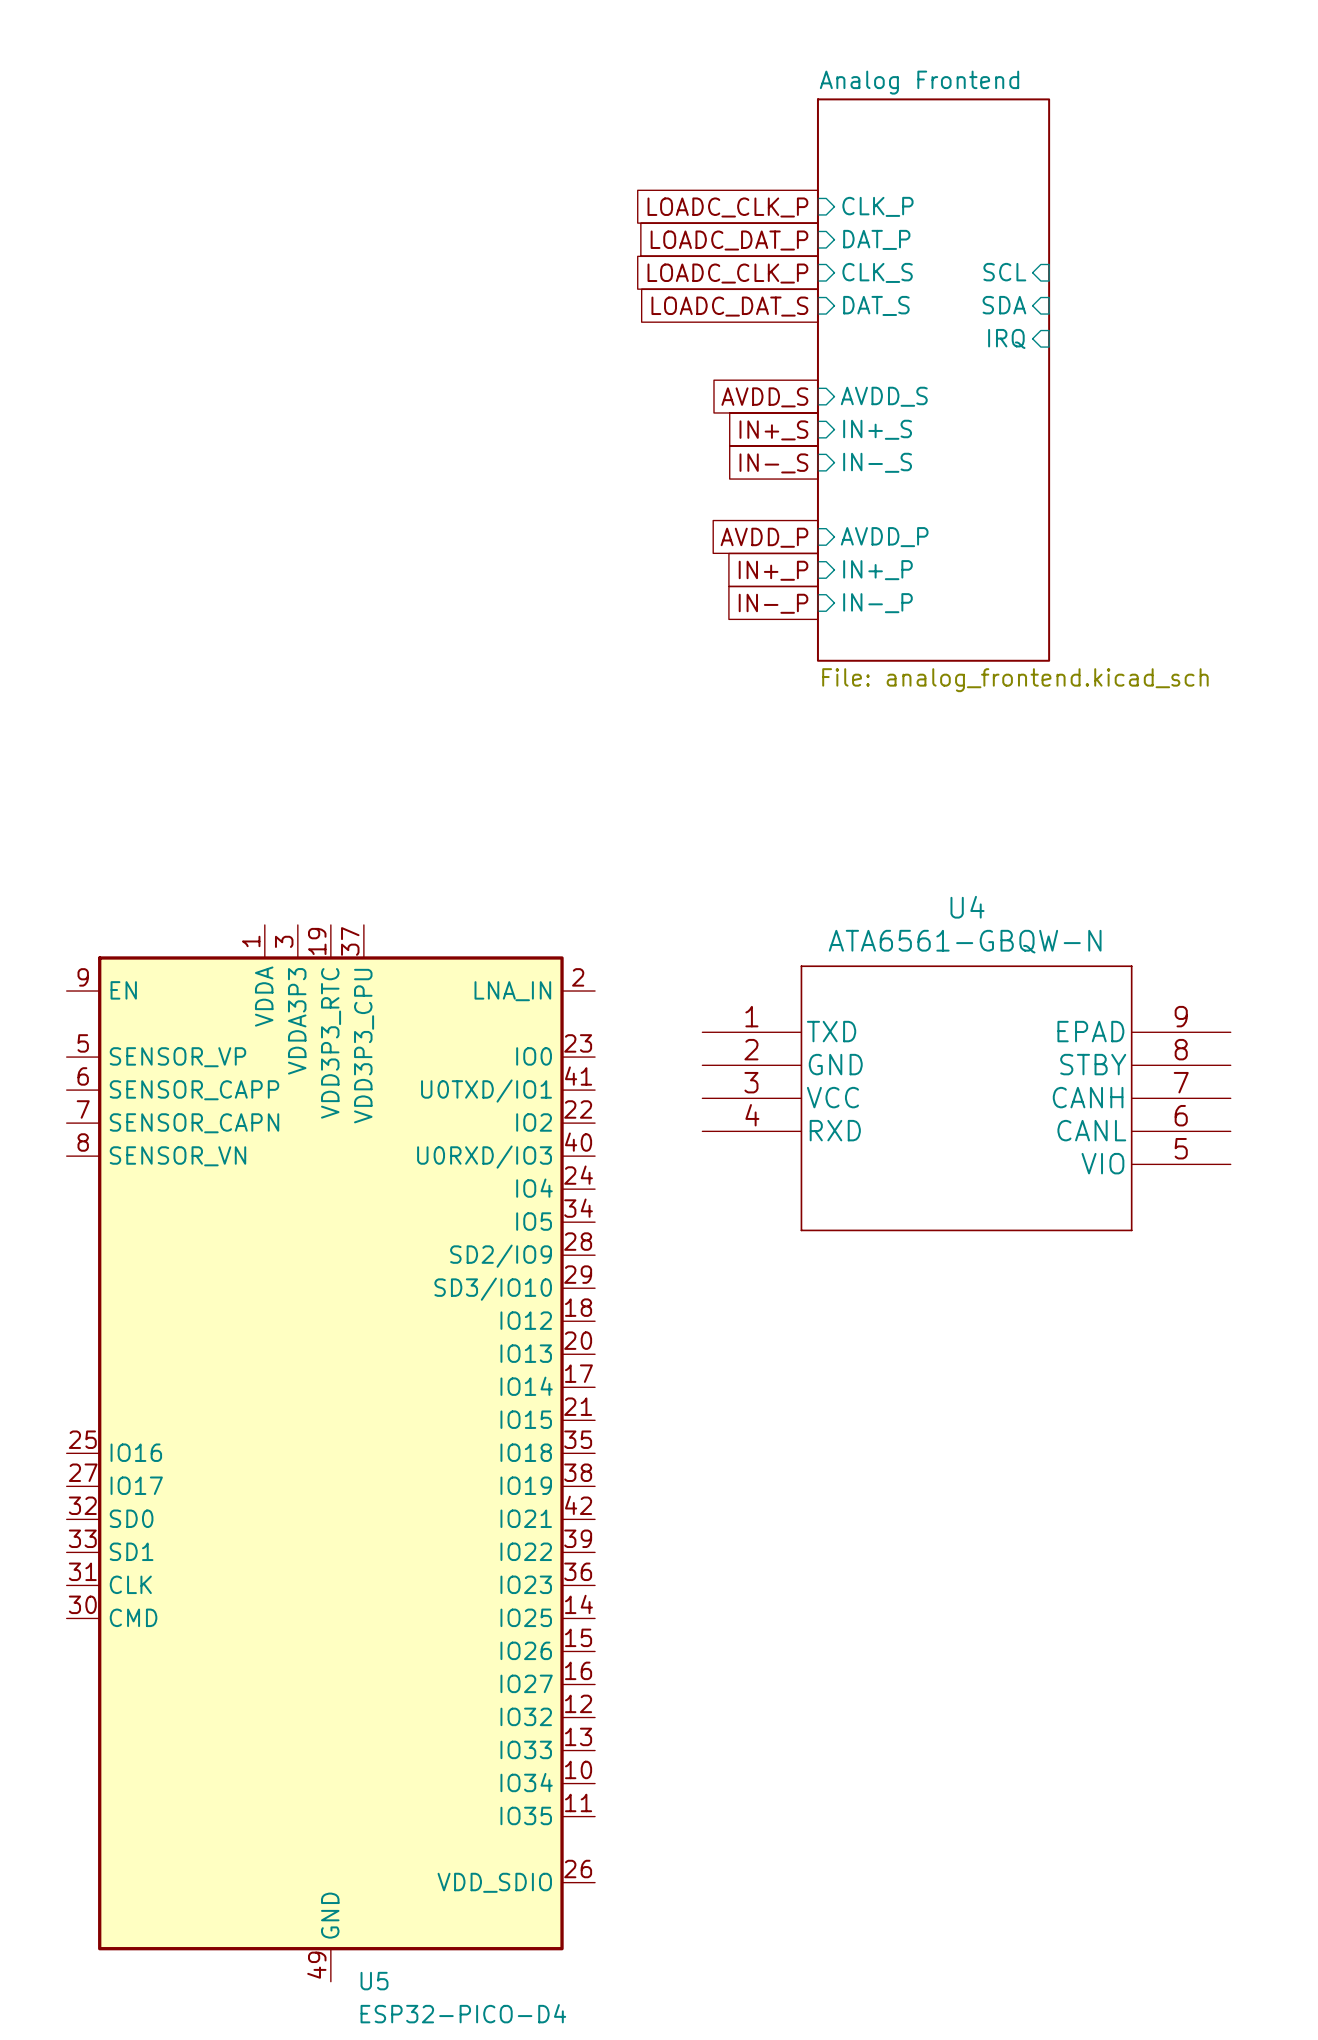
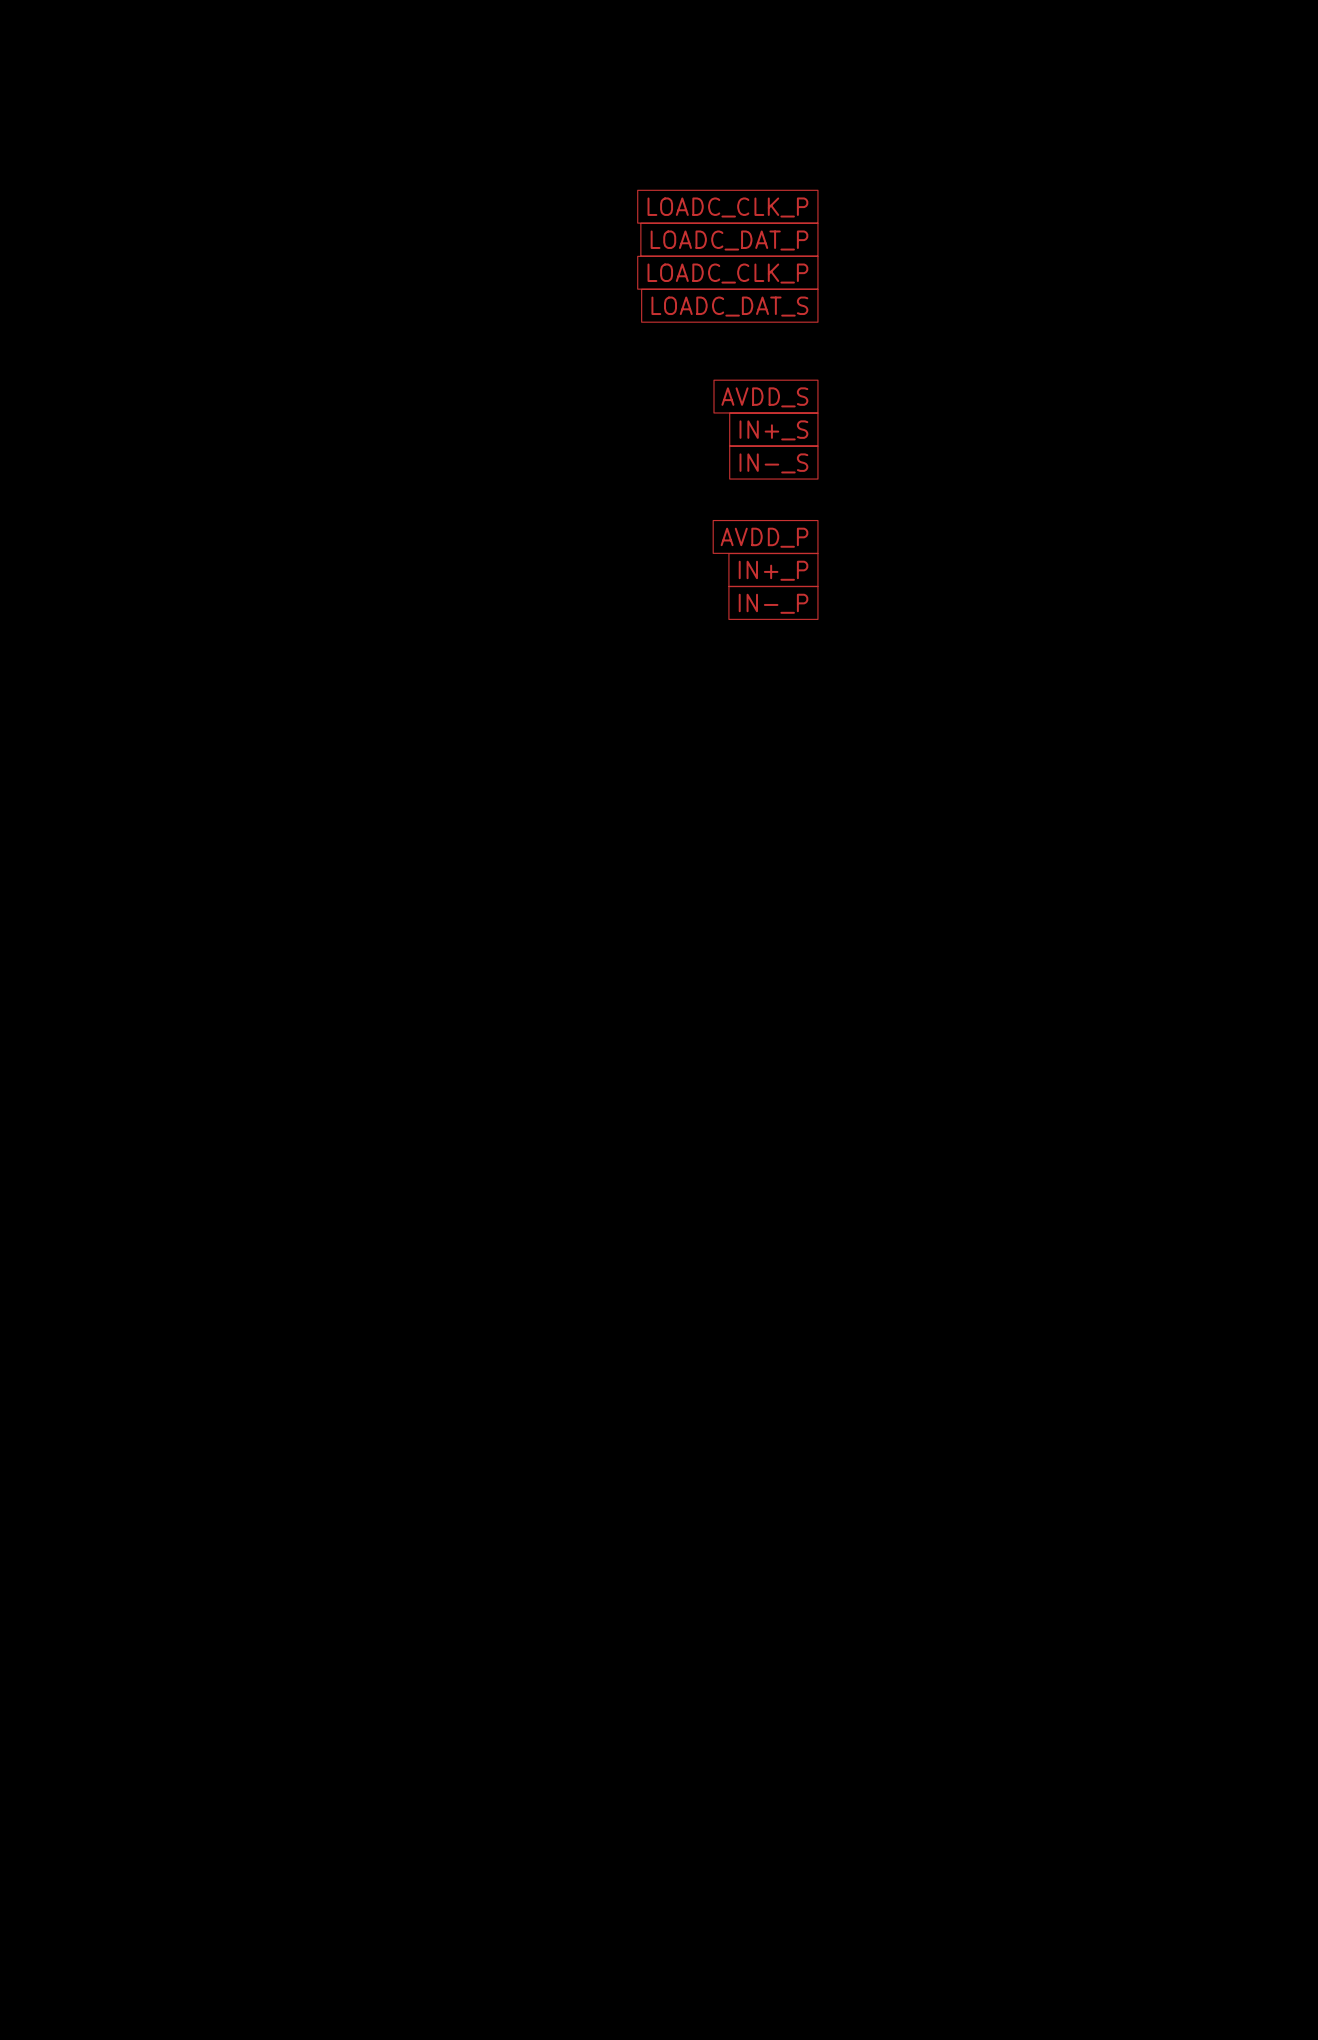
sheet pin: CLK_P (877, 206) -> none
sheet pin: DAT_P (876, 239) -> none
sheet pin: CLK_S (877, 272) -> none
sheet pin: SCL (1004, 272) -> none
sheet pin: DAT_S (876, 305) -> none
sheet pin: SDA (1004, 305) -> none
sheet pin: IRQ (1006, 338) -> none
sheet Analog Frontend: File: analog_frontend.kicad_sch (933, 380) -> none
sheet pin: AVDD_S (884, 396) -> none
sheet pin: IN+_S (877, 429) -> none
sheet pin: IN-_S (877, 462) -> none
sheet pin: AVDD_P (884, 537) -> none
sheet pin: IN+_P (877, 570) -> none
sheet pin: IN-_P (877, 603) -> none
U4: ATA6561-GBQW-N (966, 1098) -> none
U5: ESP32-PICO-D4 (330, 1453) -> none

